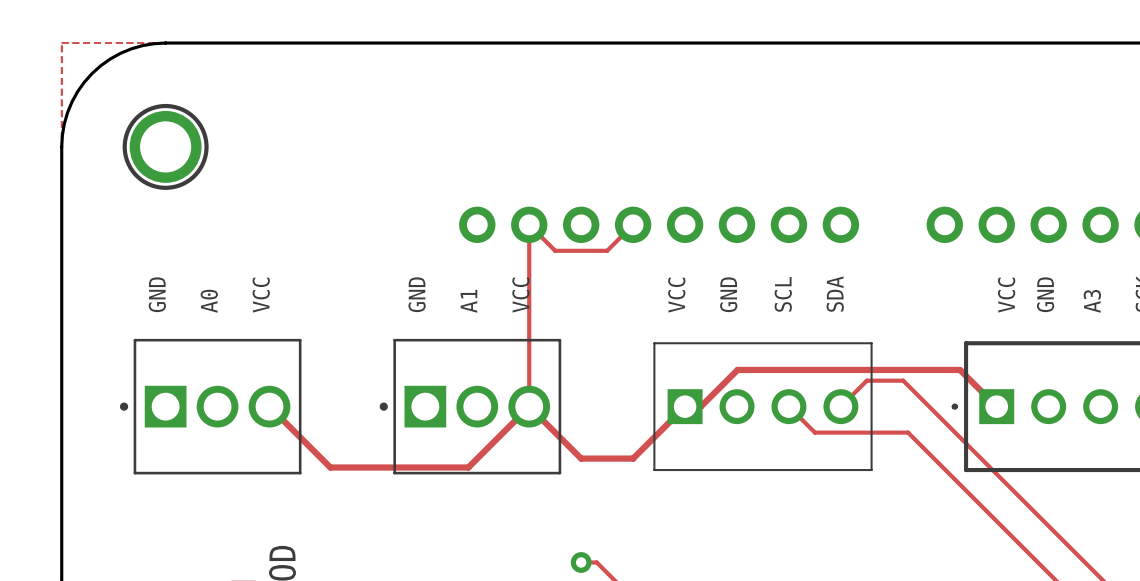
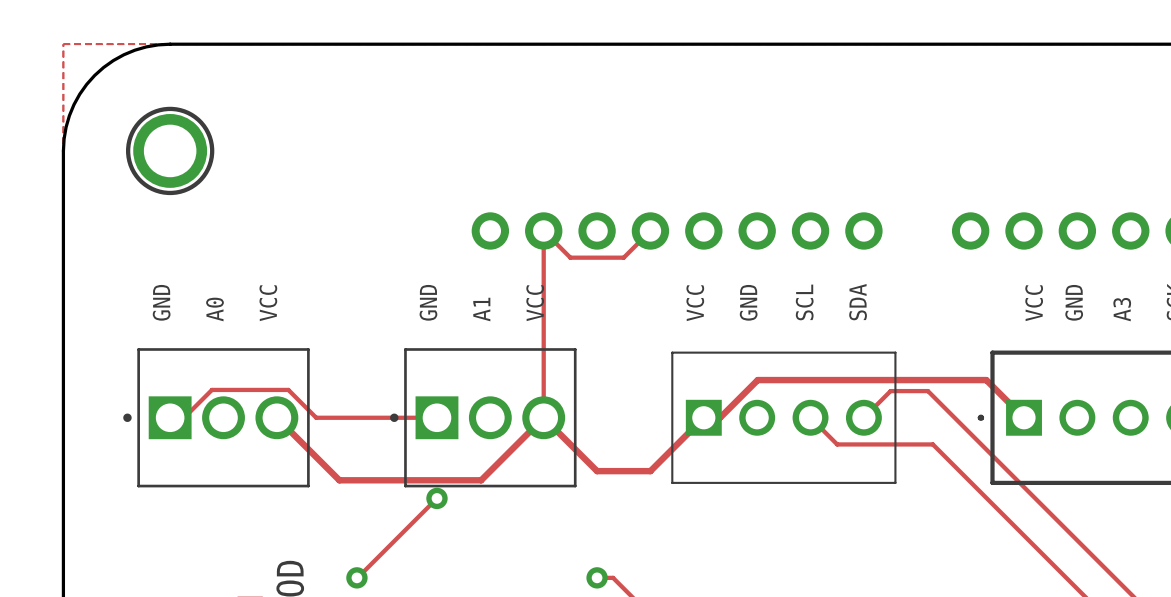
track: none -> (170, 417) (184, 417) (211, 389) (288, 389) (316, 417) (436, 417)
track: none -> (436, 498) (356, 577)
via: none -> (436, 498)
via: none -> (356, 577)

